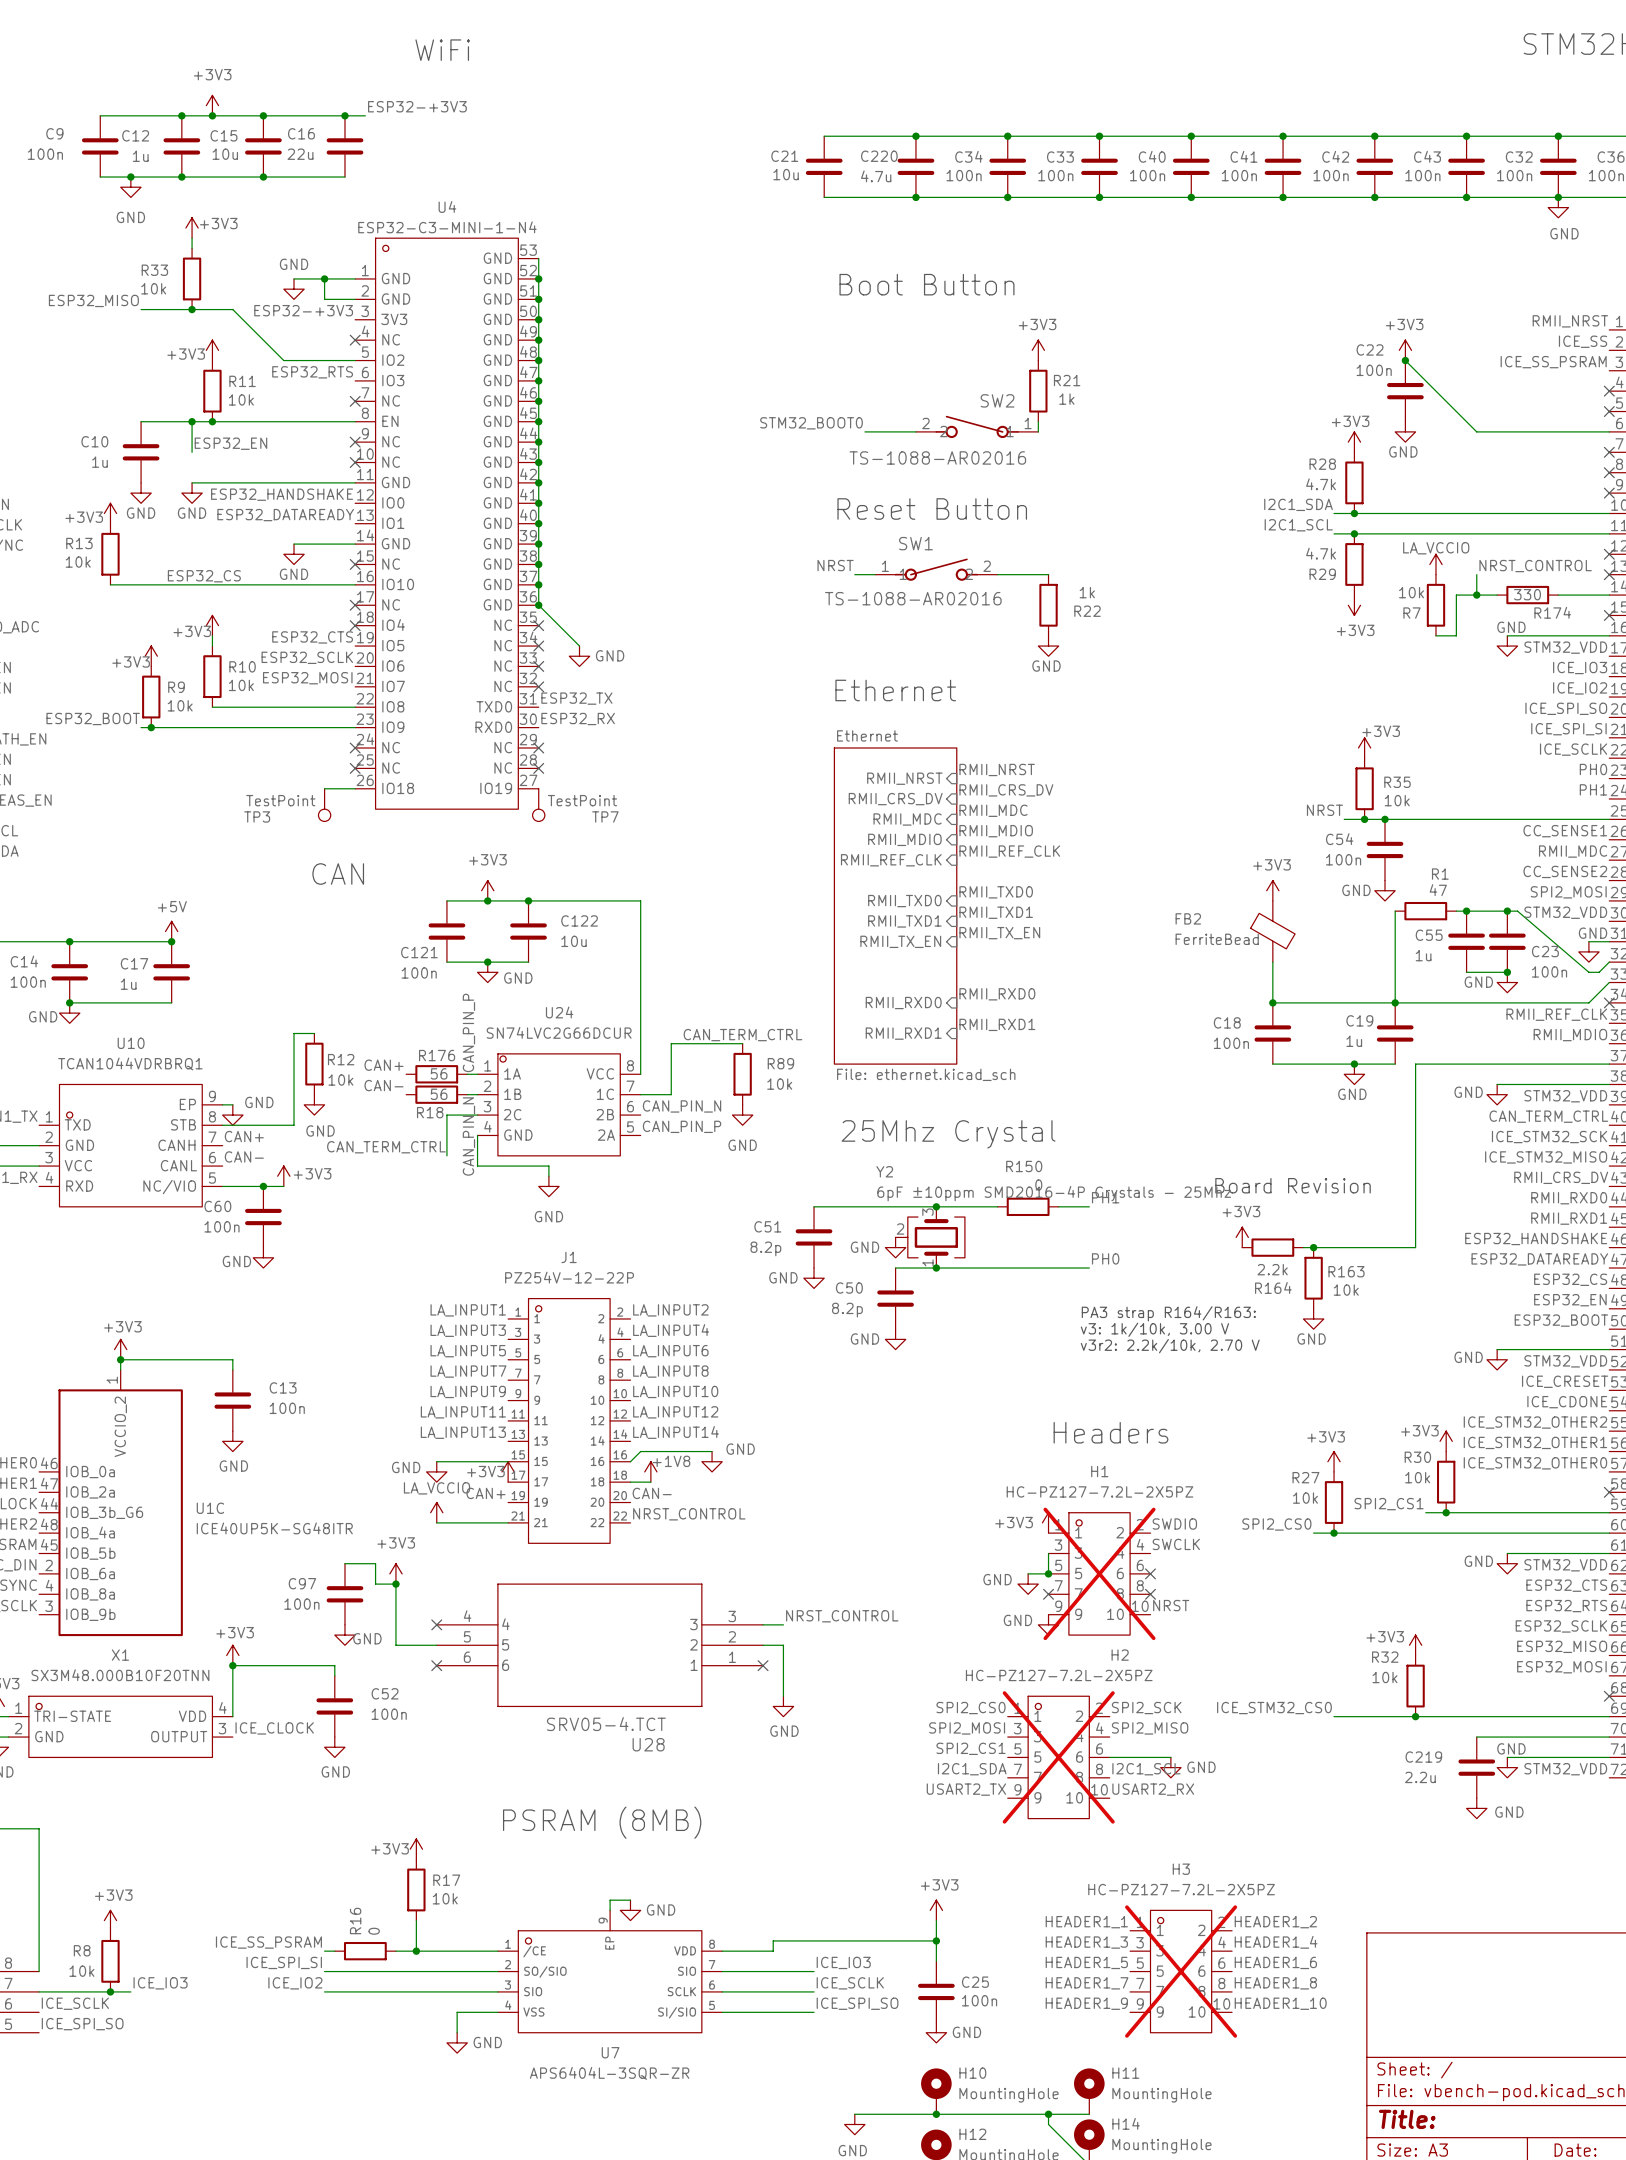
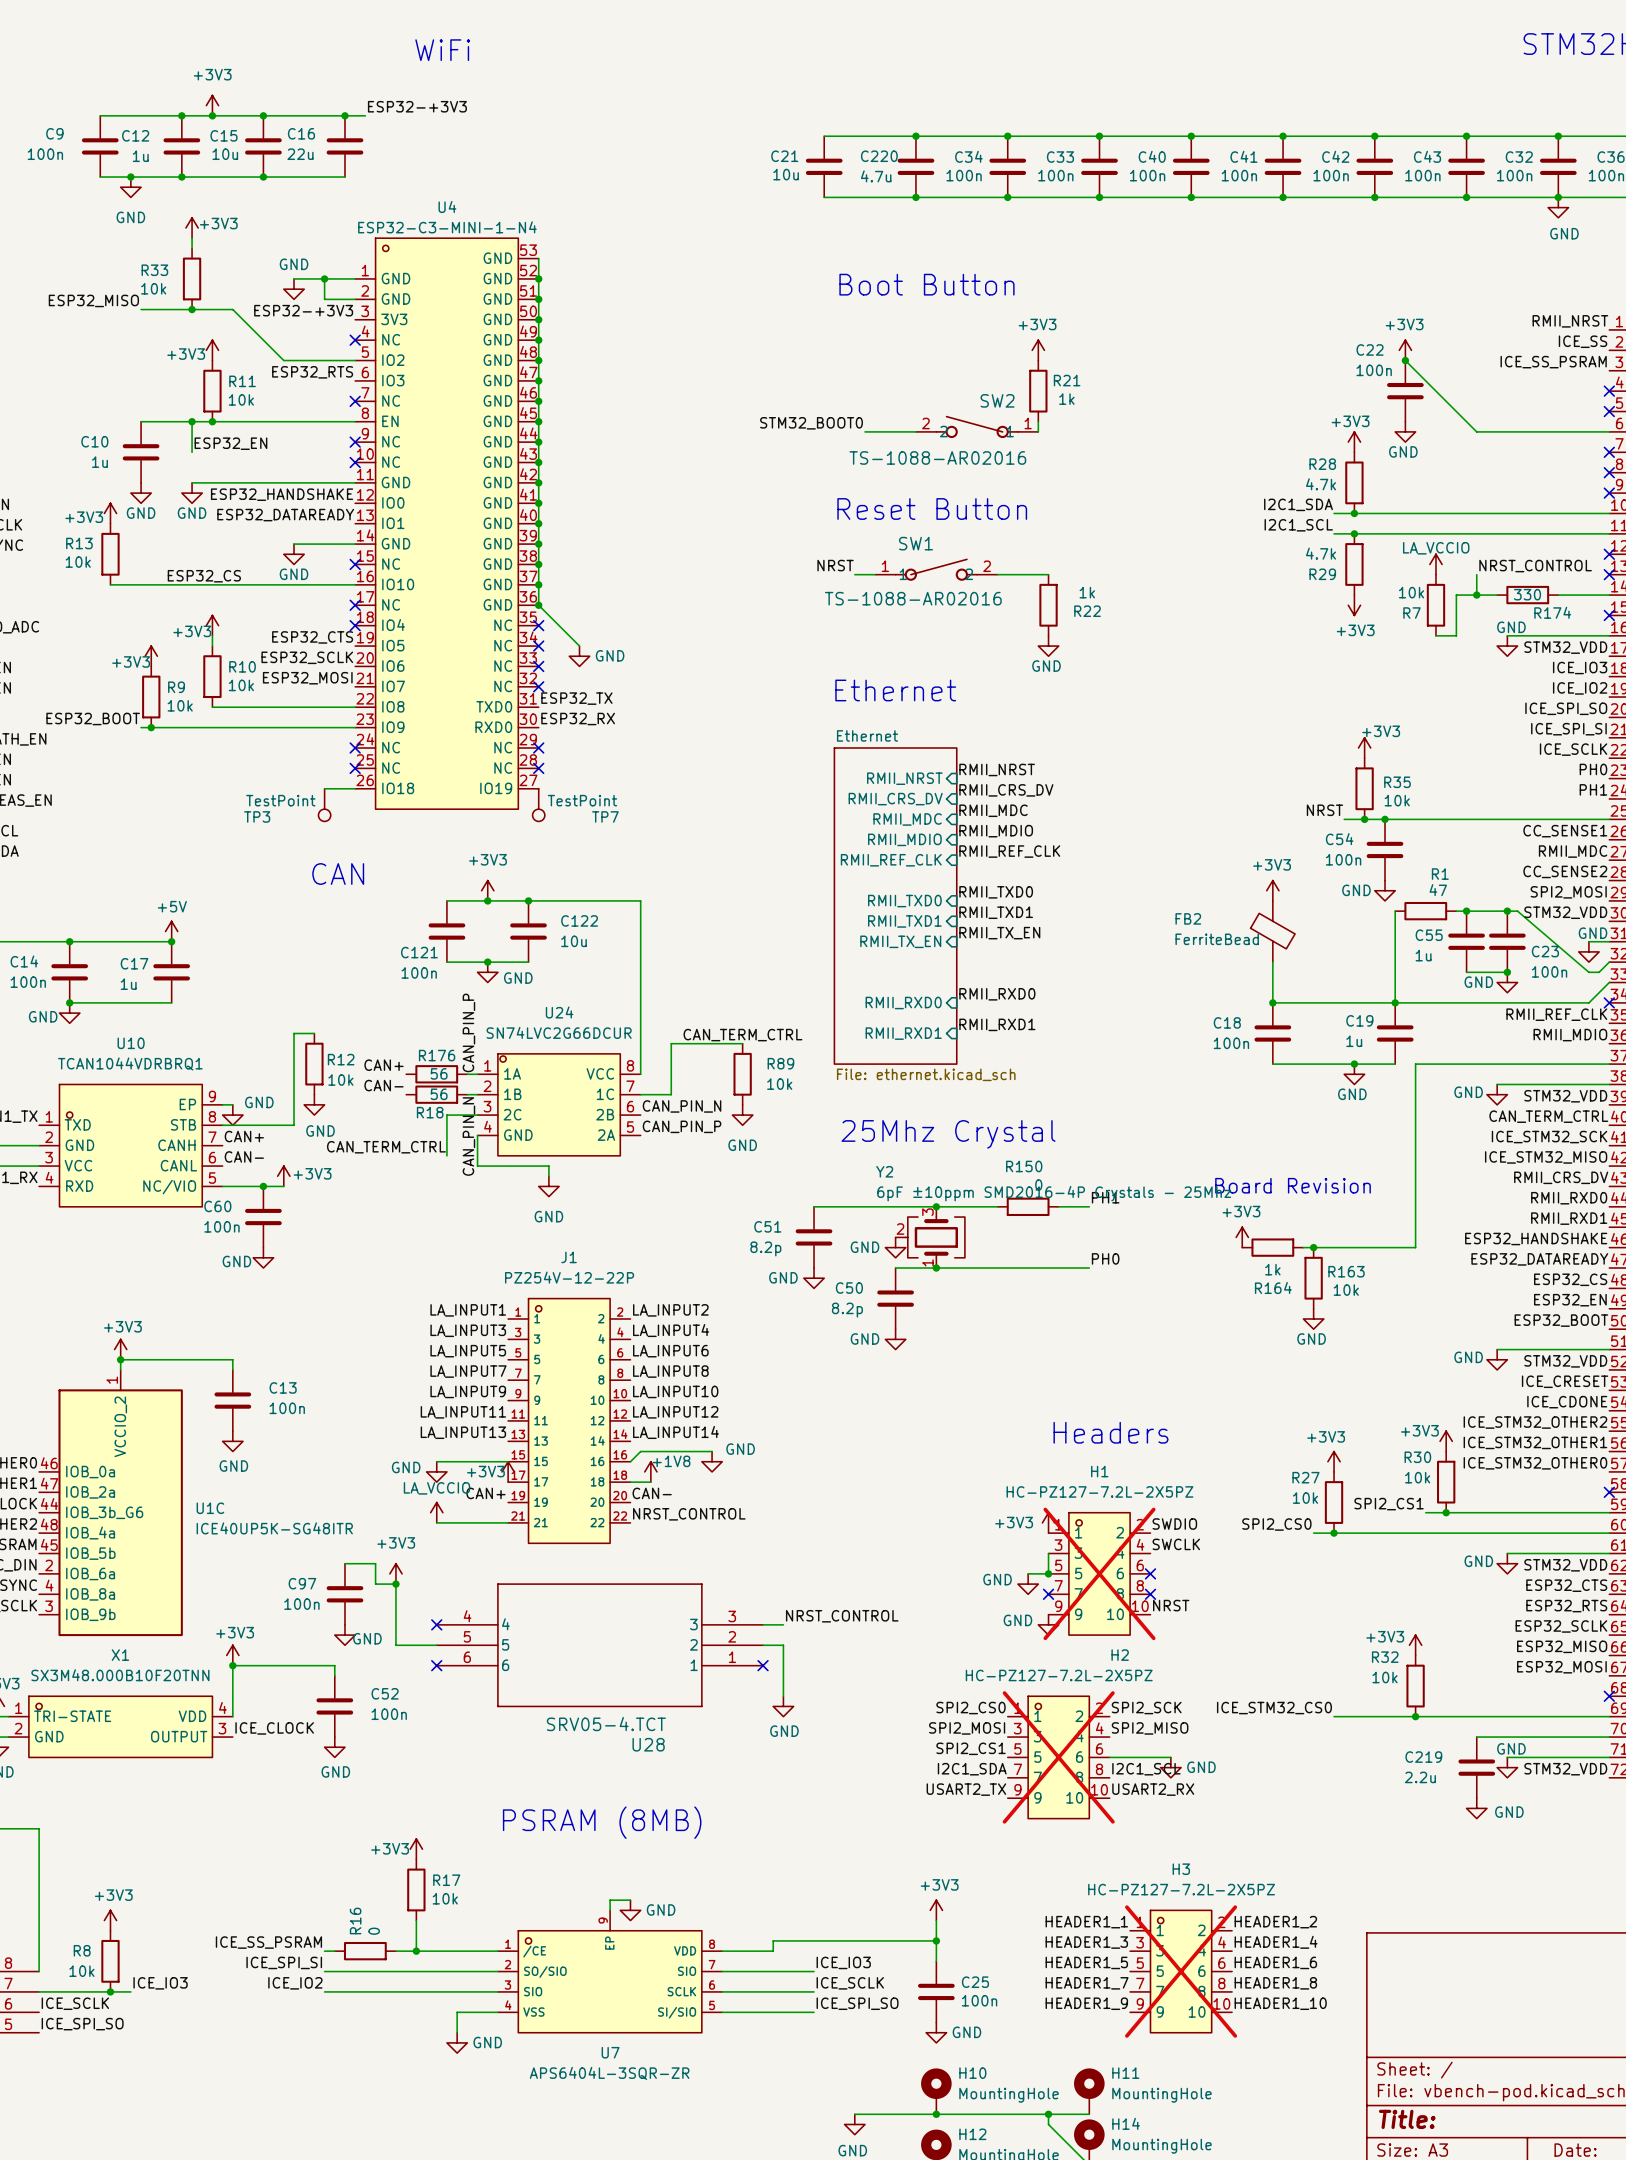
R164 value: 2.2k (1272, 1269) -> 1k (1272, 1269)
text: PA3 strap R164/R163: (1168, 1313) -> none
text: v3: 1k/10k, 3.00 V (1154, 1329) -> none
text: v3r2: 2.2k/10k, 2.70 V (1170, 1346) -> none

